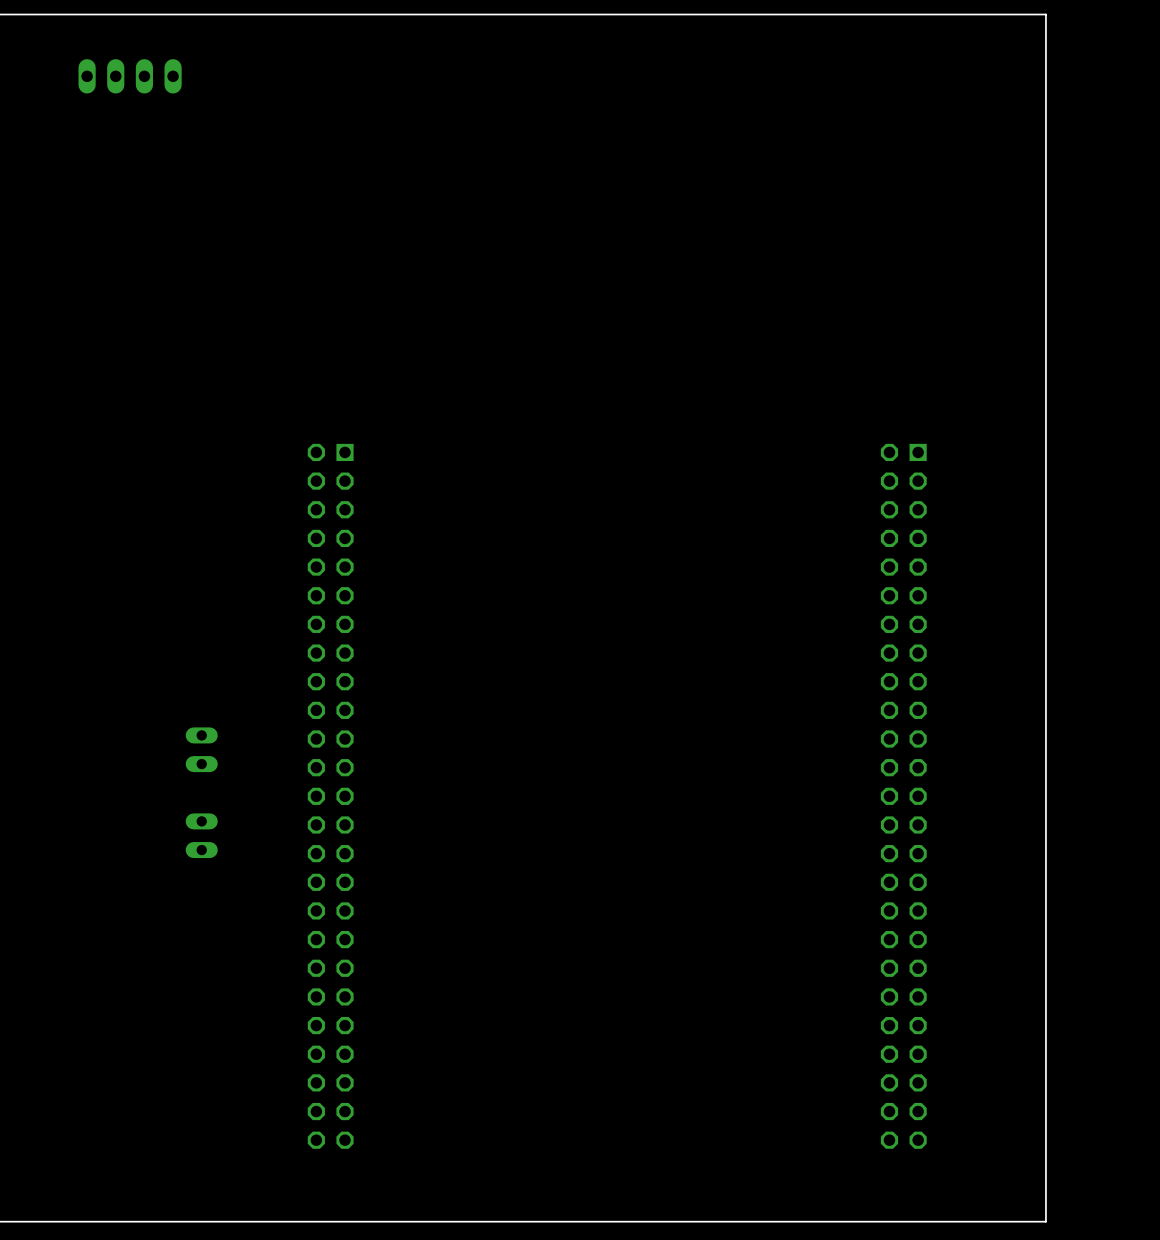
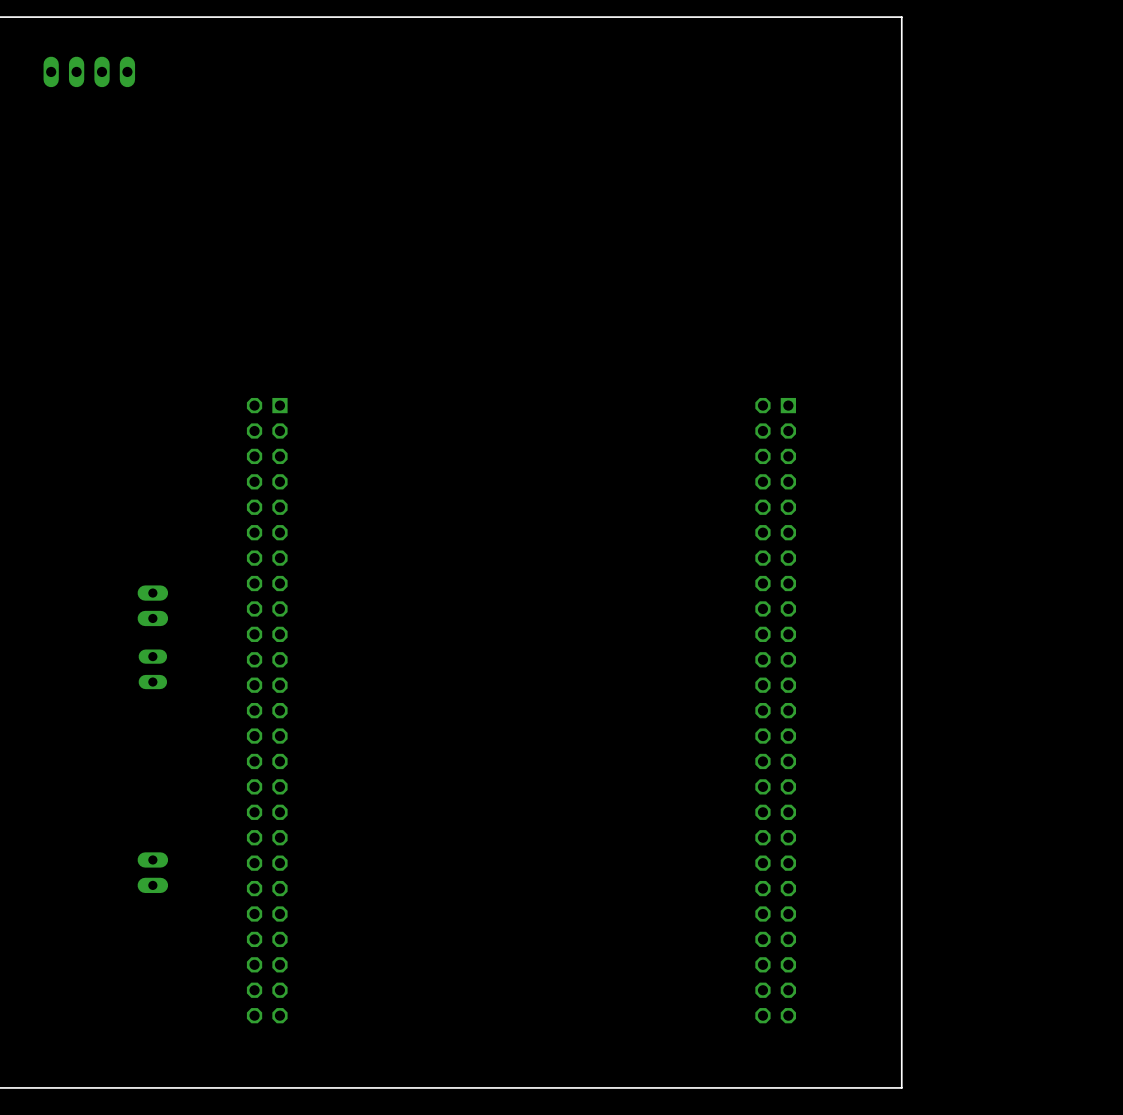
part: none -> (152, 605)
part: (201, 835) -> none
part: none -> (152, 872)

